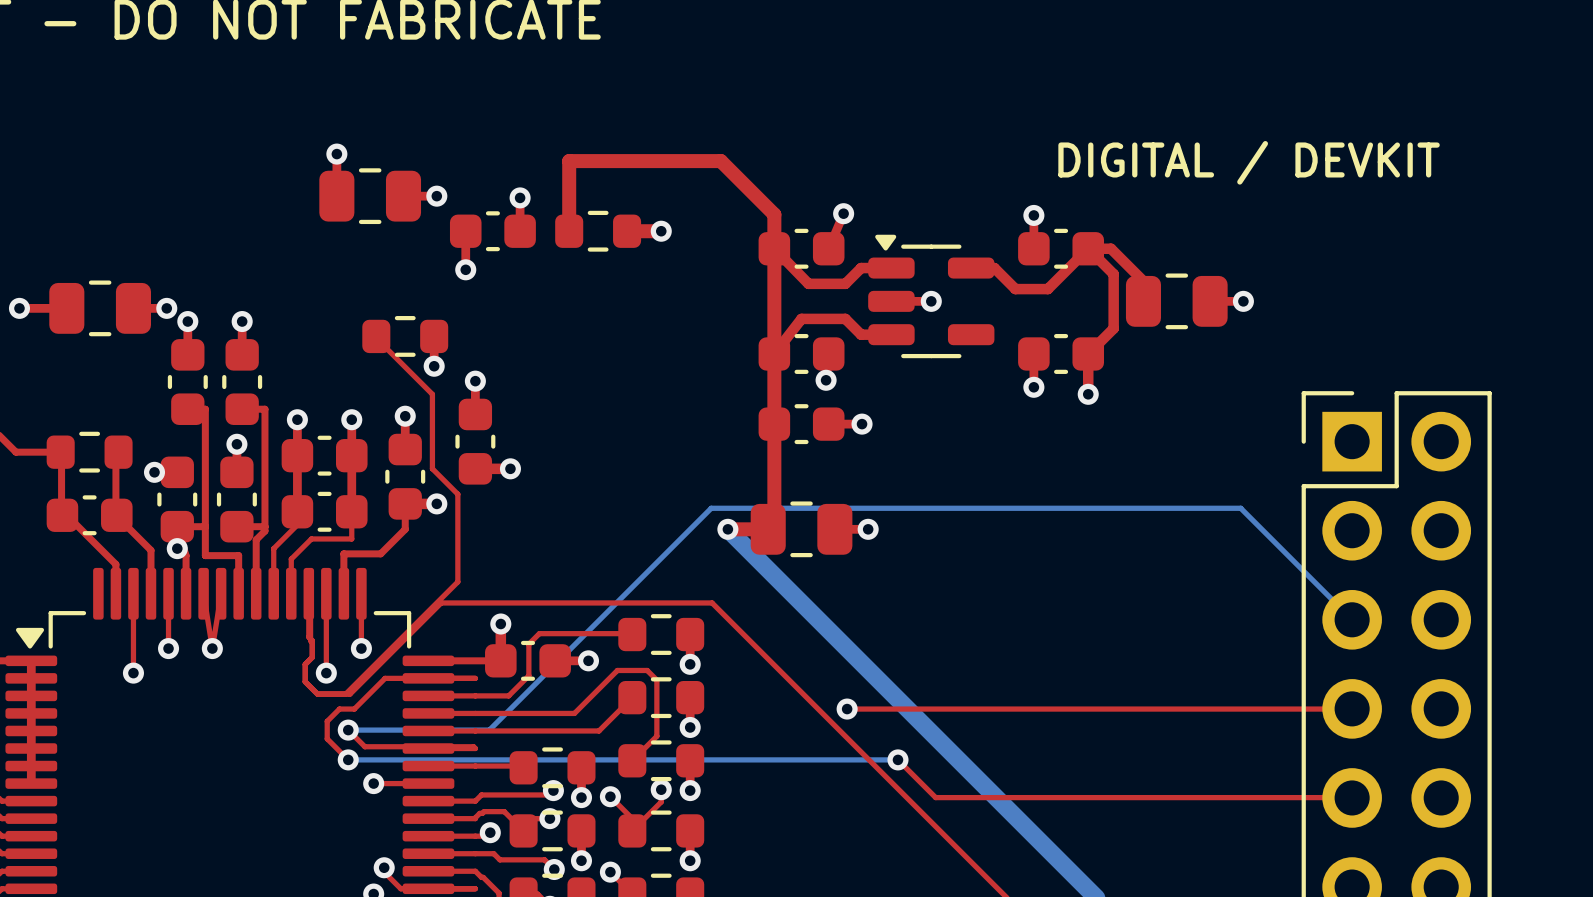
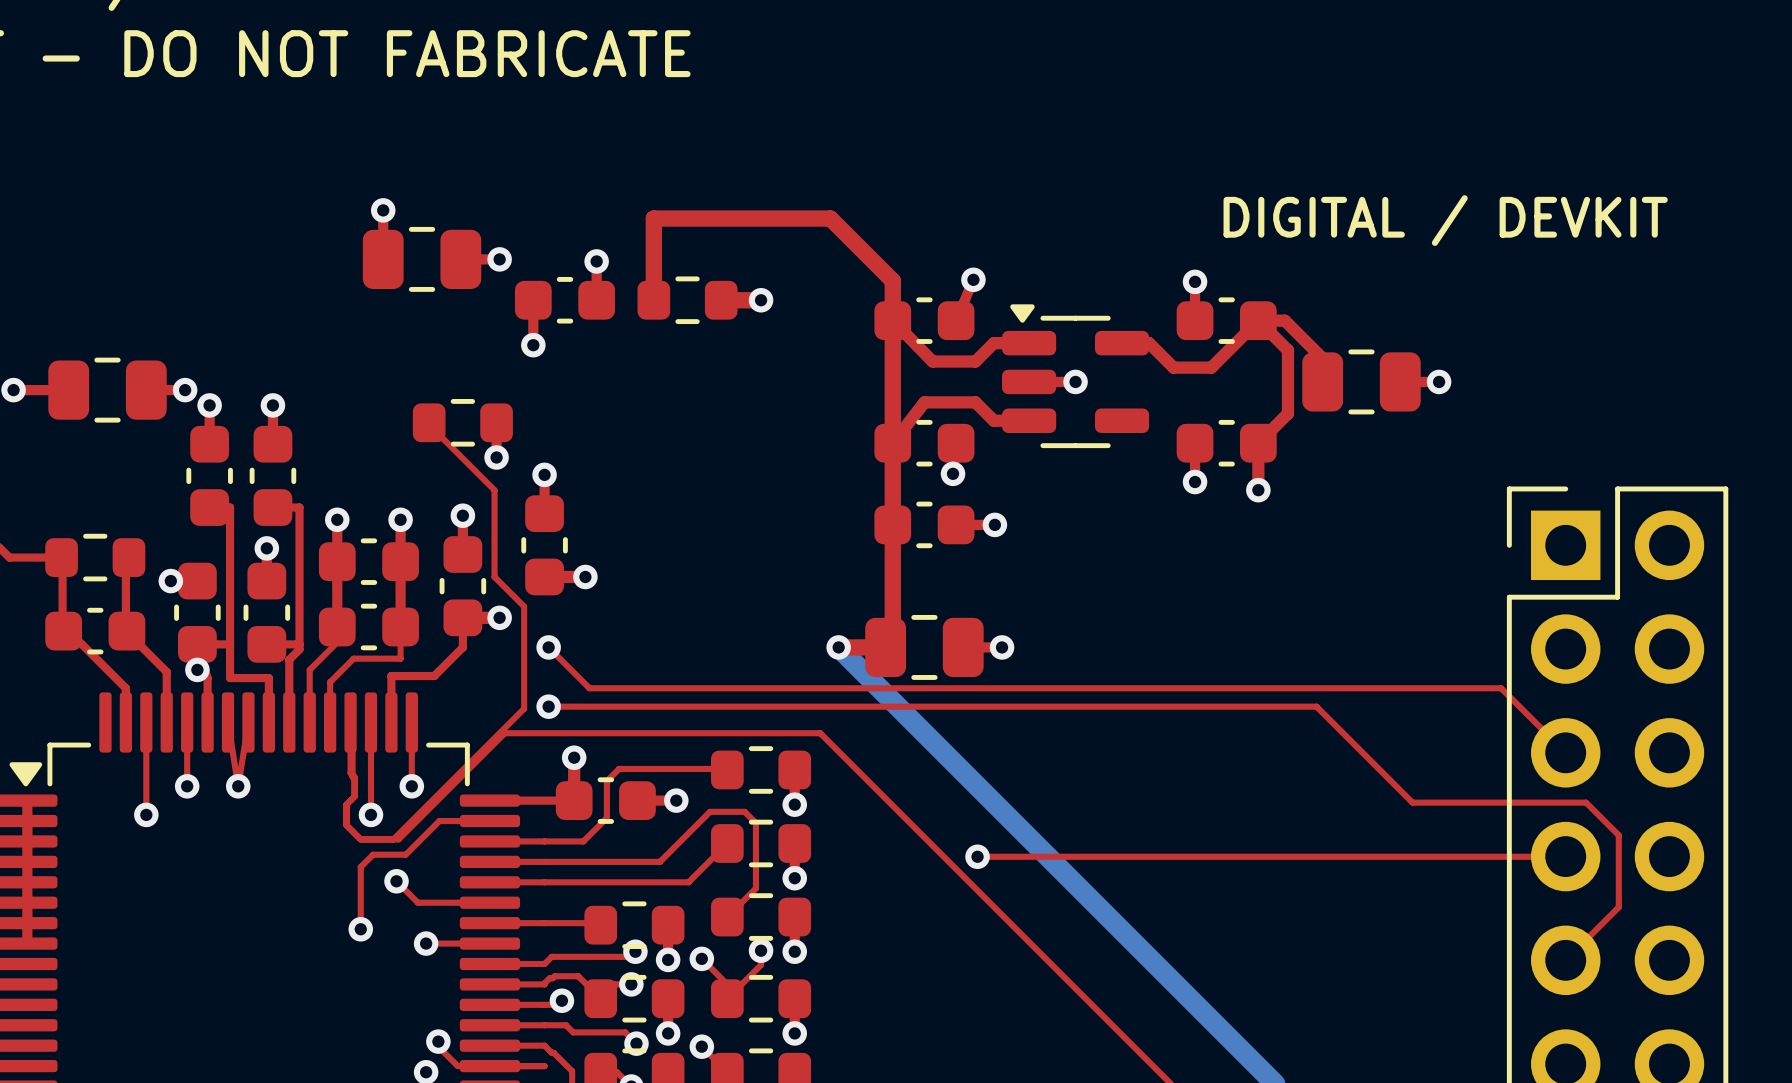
top track: none -> (548, 647) (589, 688) (1501, 688) (1565, 752)
via: none -> (548, 647)
via: none -> (548, 706)
bottom track: (1352, 619) (1240, 508) (711, 508) (489, 730) (348, 730) -> none
top track: (356, 707) (354, 709) (339, 709) (327, 721) (327, 738) (348, 759) -> (405, 854) (373, 854) (360, 866) (360, 929)
top track: (364, 746) (473, 746) (475, 748) (428, 748) -> (415, 900) (417, 902) (489, 902)
bottom track: (348, 759) (897, 759) -> none
via position: (348, 759) -> (360, 929)
top track: (897, 759) (935, 797) (1352, 797) -> (548, 706) (1316, 706) (1412, 802) (1586, 802) (1618, 835) (1618, 907) (1565, 960)
via: (897, 759) -> none

